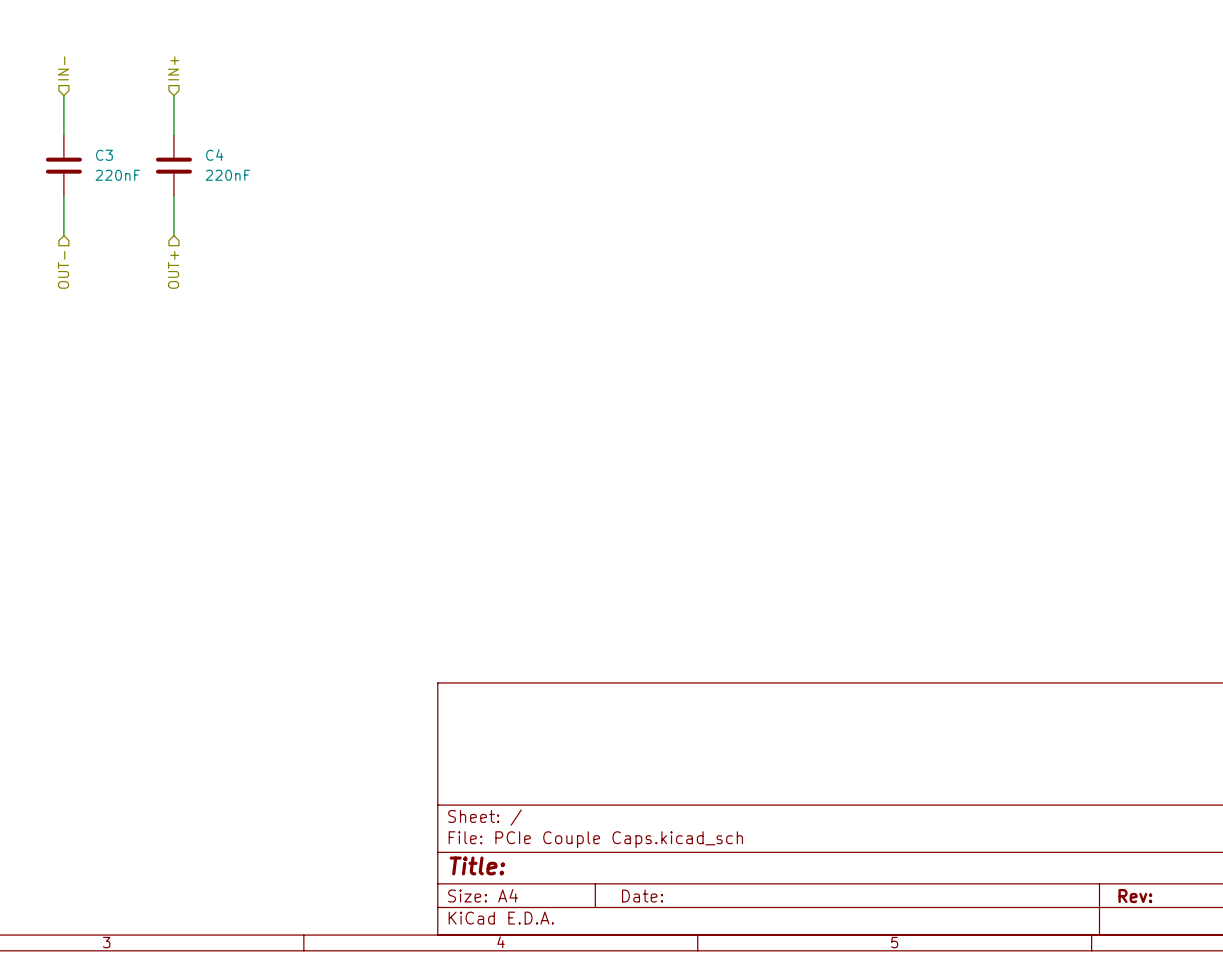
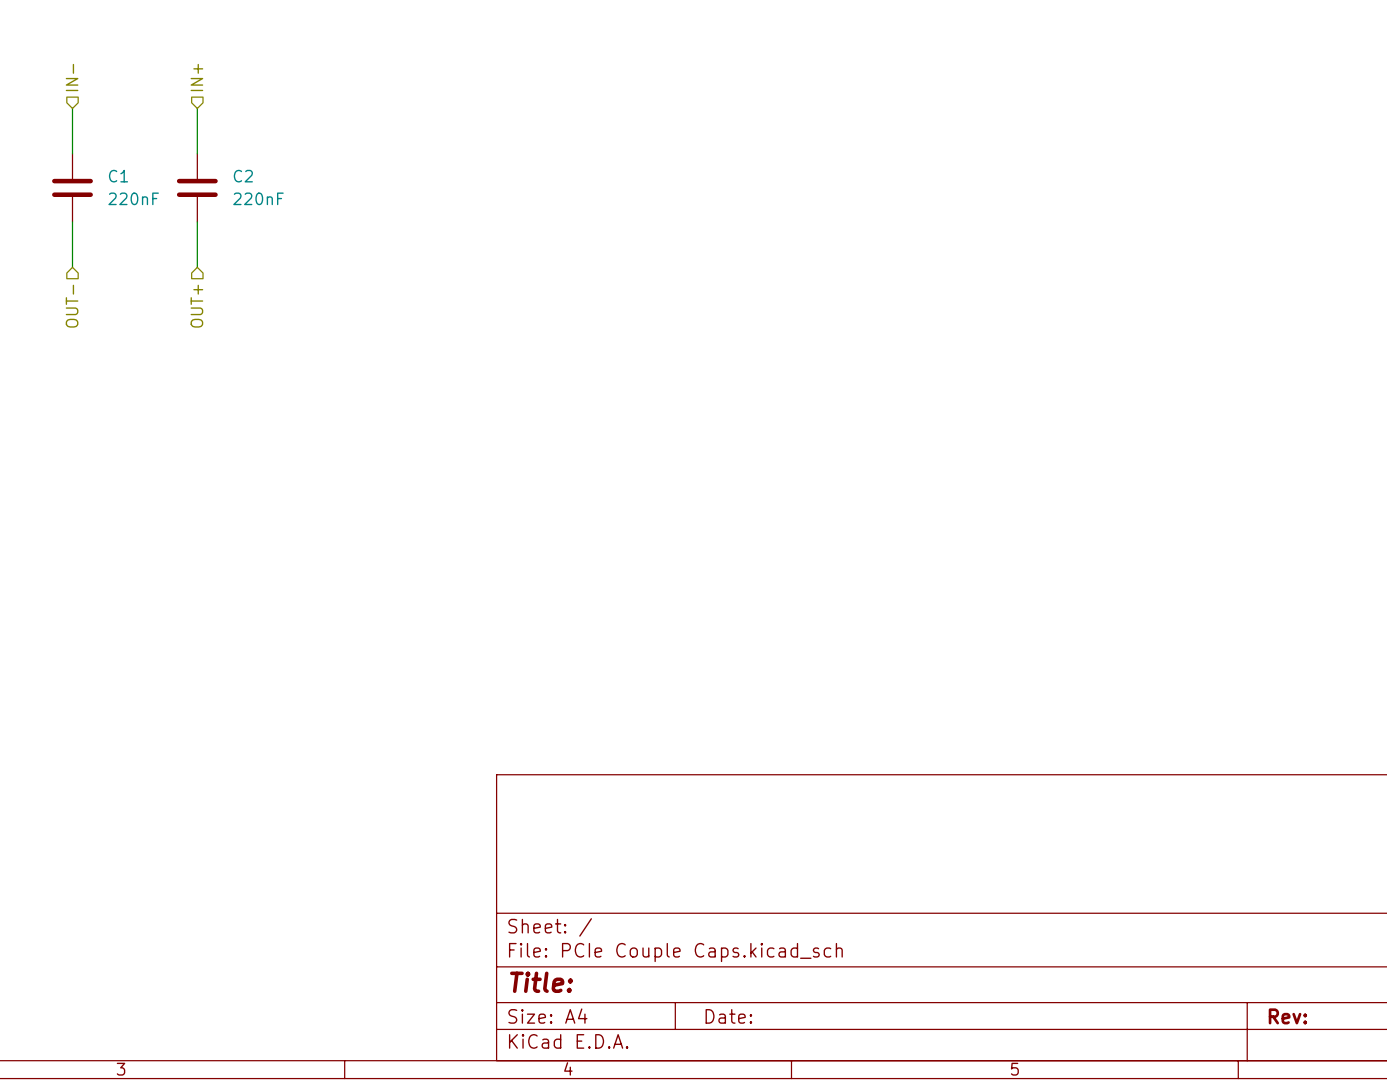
C3 name: C3 (104, 155) -> C1 (118, 176)
C4 name: C4 (214, 155) -> C2 (243, 176)

